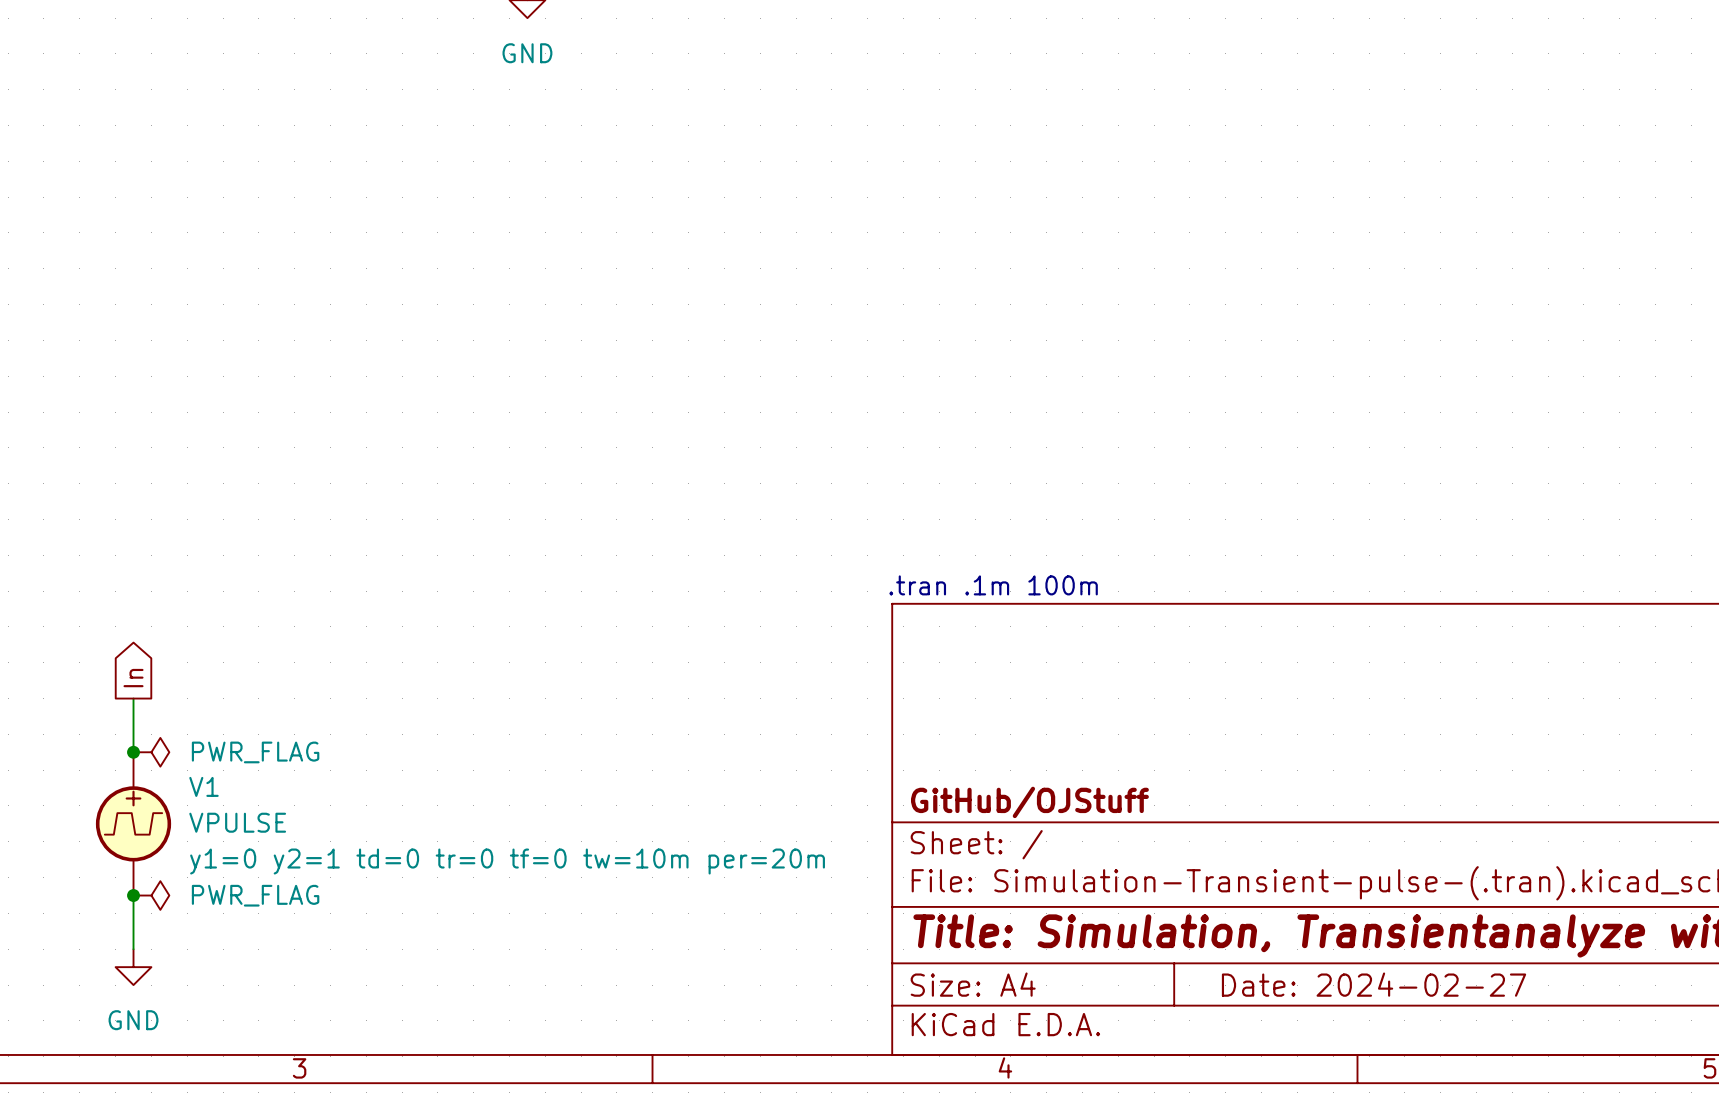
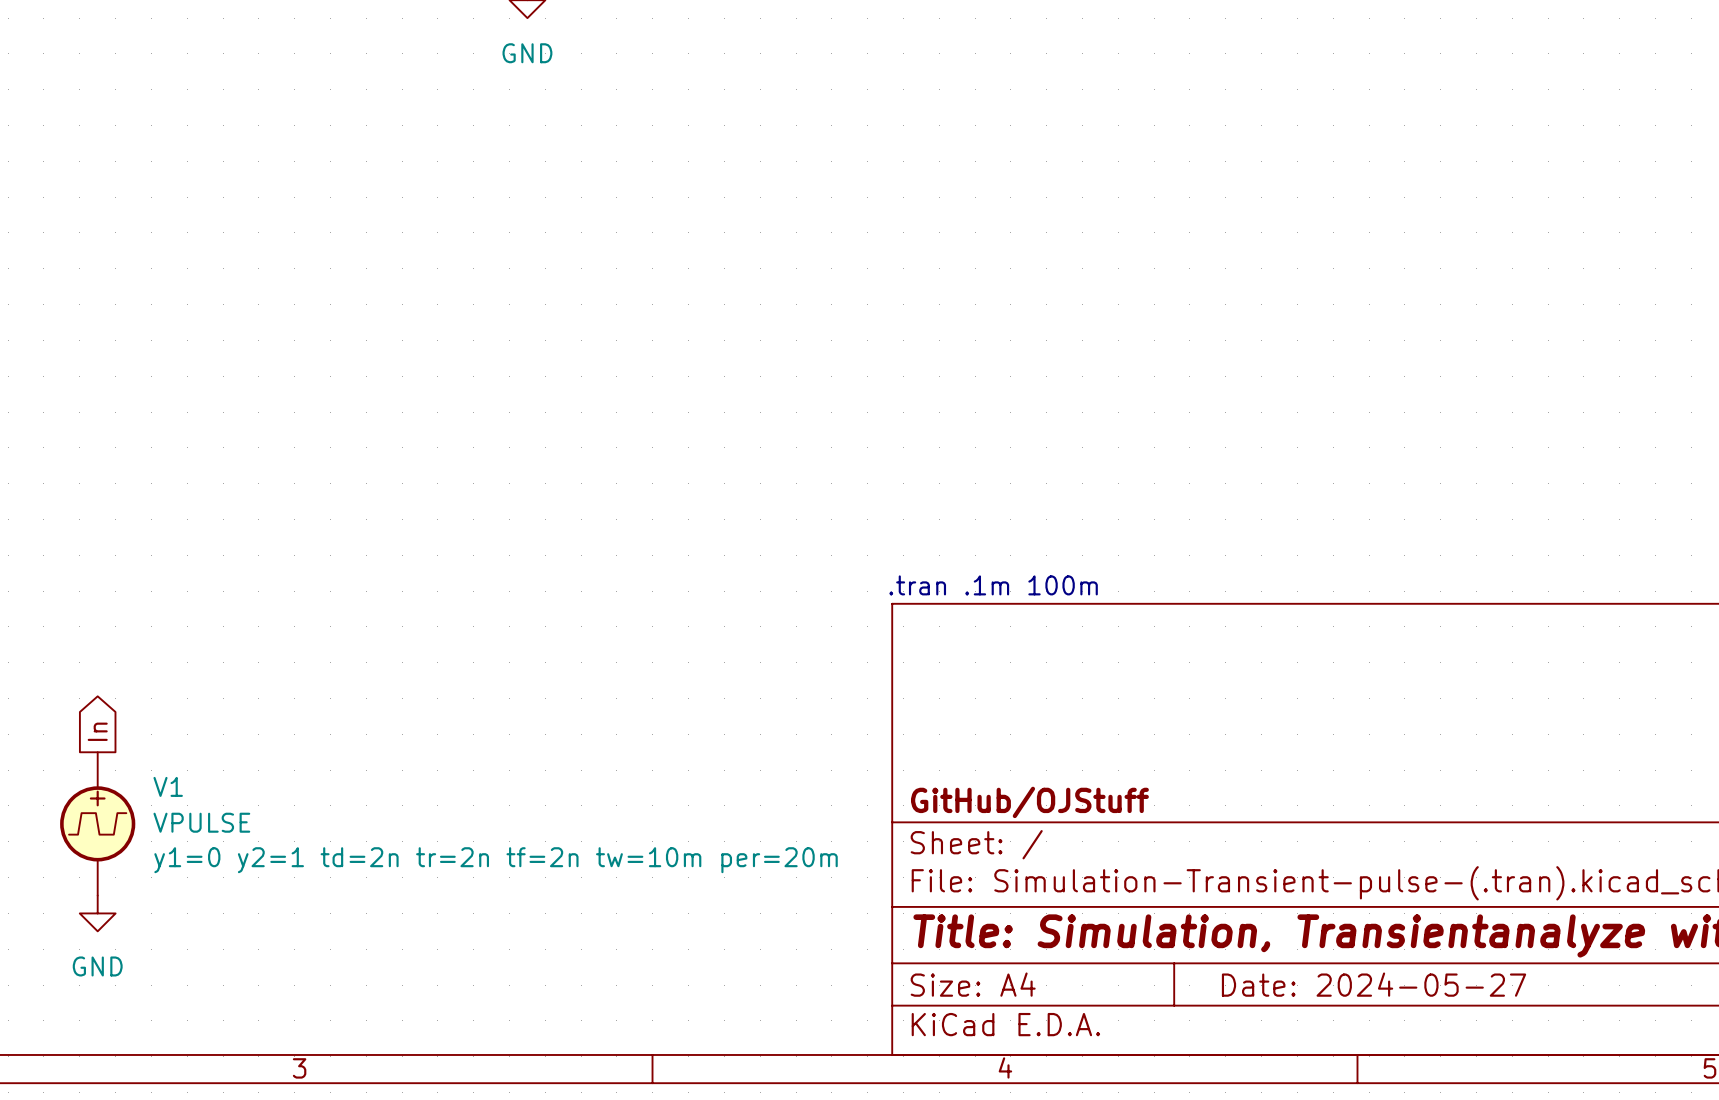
global label position: In (133, 678) -> In (97, 731)
wire: (133, 698) (133, 752) -> none
junction: (133, 752) -> none
power symbol: PWR_FLAG (151, 752) -> none
V1 position: (133, 823) -> (97, 823)
V1 text: y1=0 y2=1 td=0 tr=0 tf=0 tw=10m per=20m (507, 861) -> y1=0 y2=1 td=2n tr=2n tf=2n tw=10m per=20m (496, 860)
wire: (133, 895) (133, 949) -> none
junction: (133, 895) -> none
power symbol: PWR_FLAG (151, 895) -> none
power symbol position: GND (133, 967) -> GND (97, 913)
title block: Date: 2024-02-27 (1374, 984) -> Date: 2024-05-27 (1374, 984)

